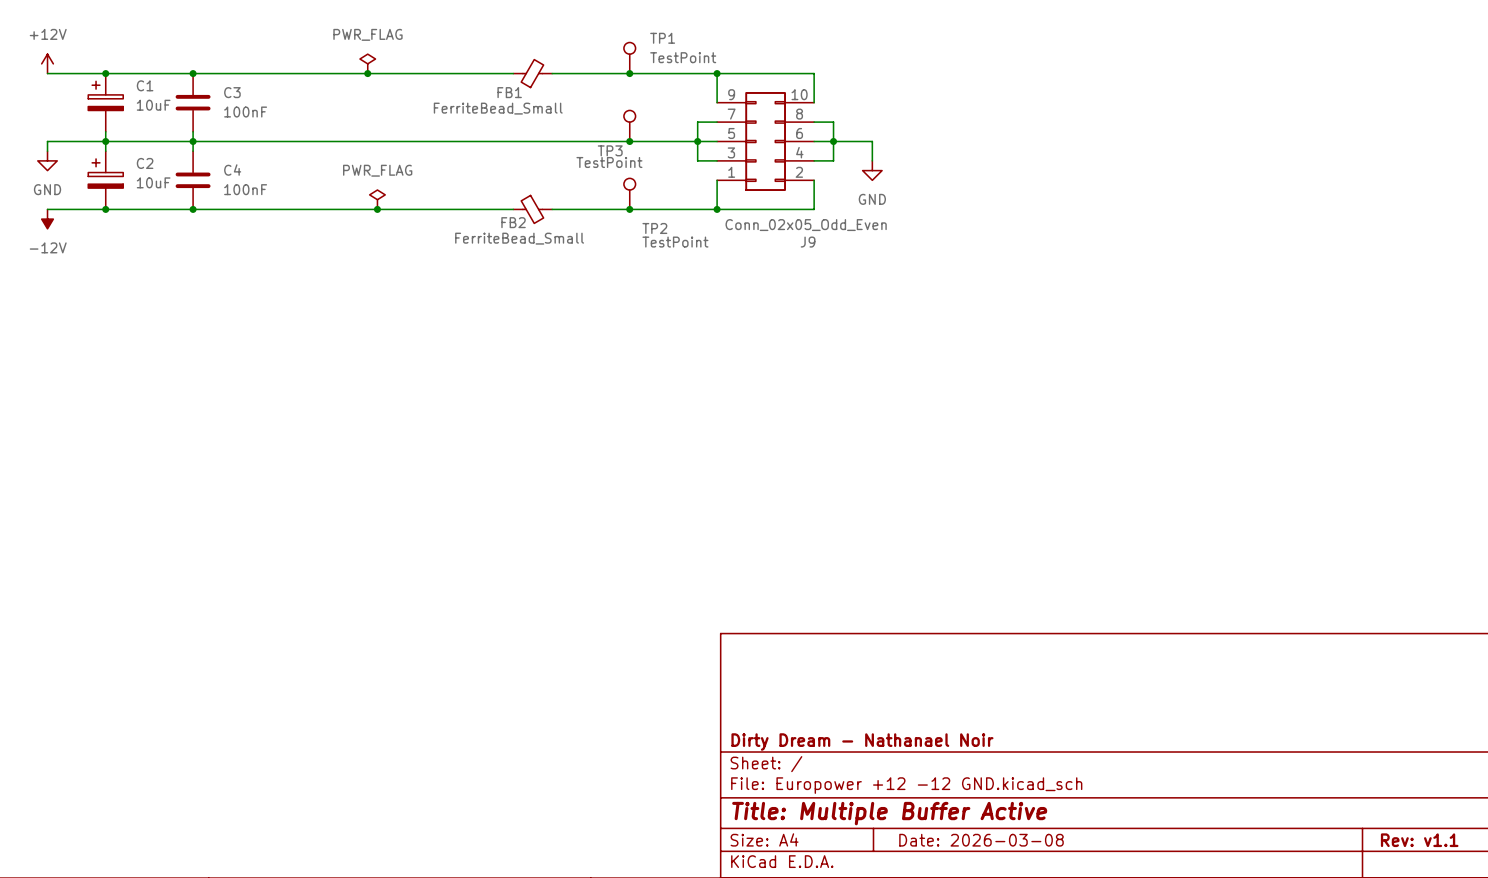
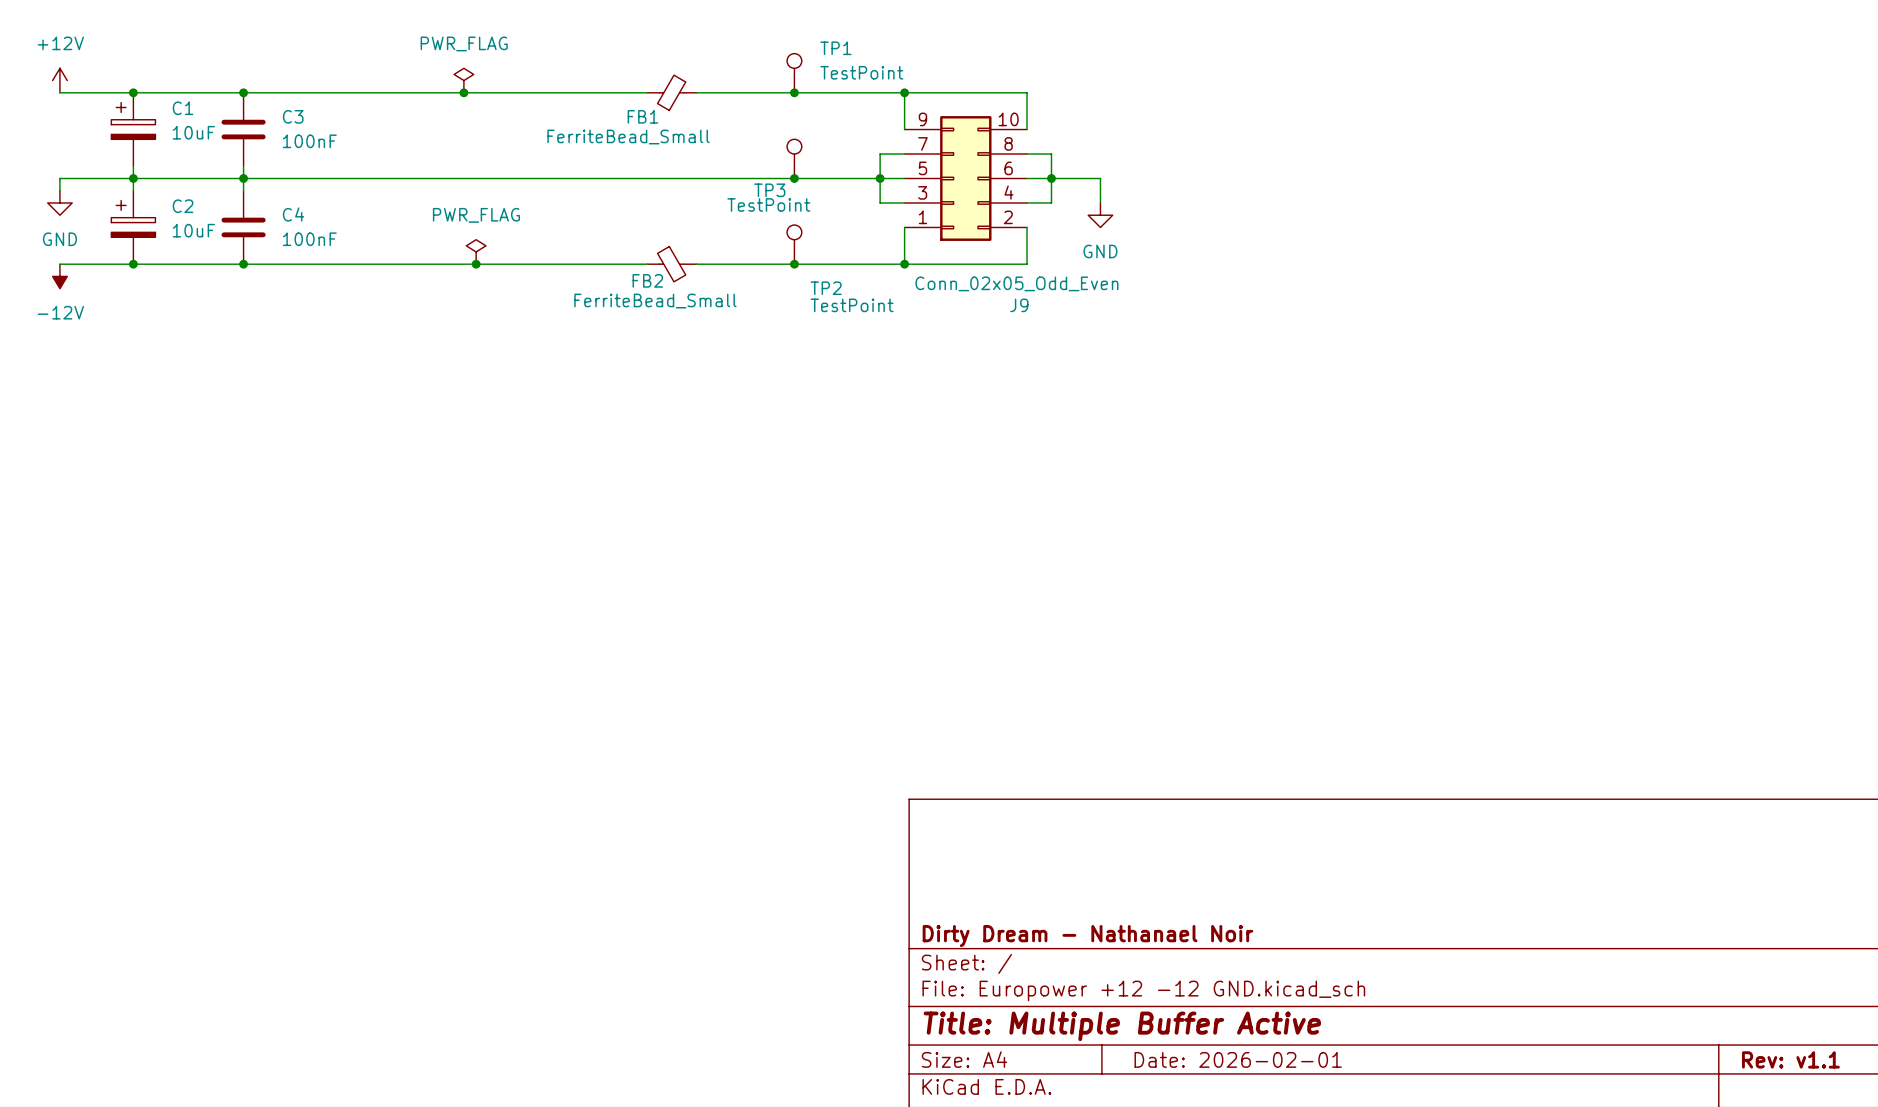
title block: Date: 2026-03-08 (981, 840) -> Date: 2026-02-01 (1238, 1059)

